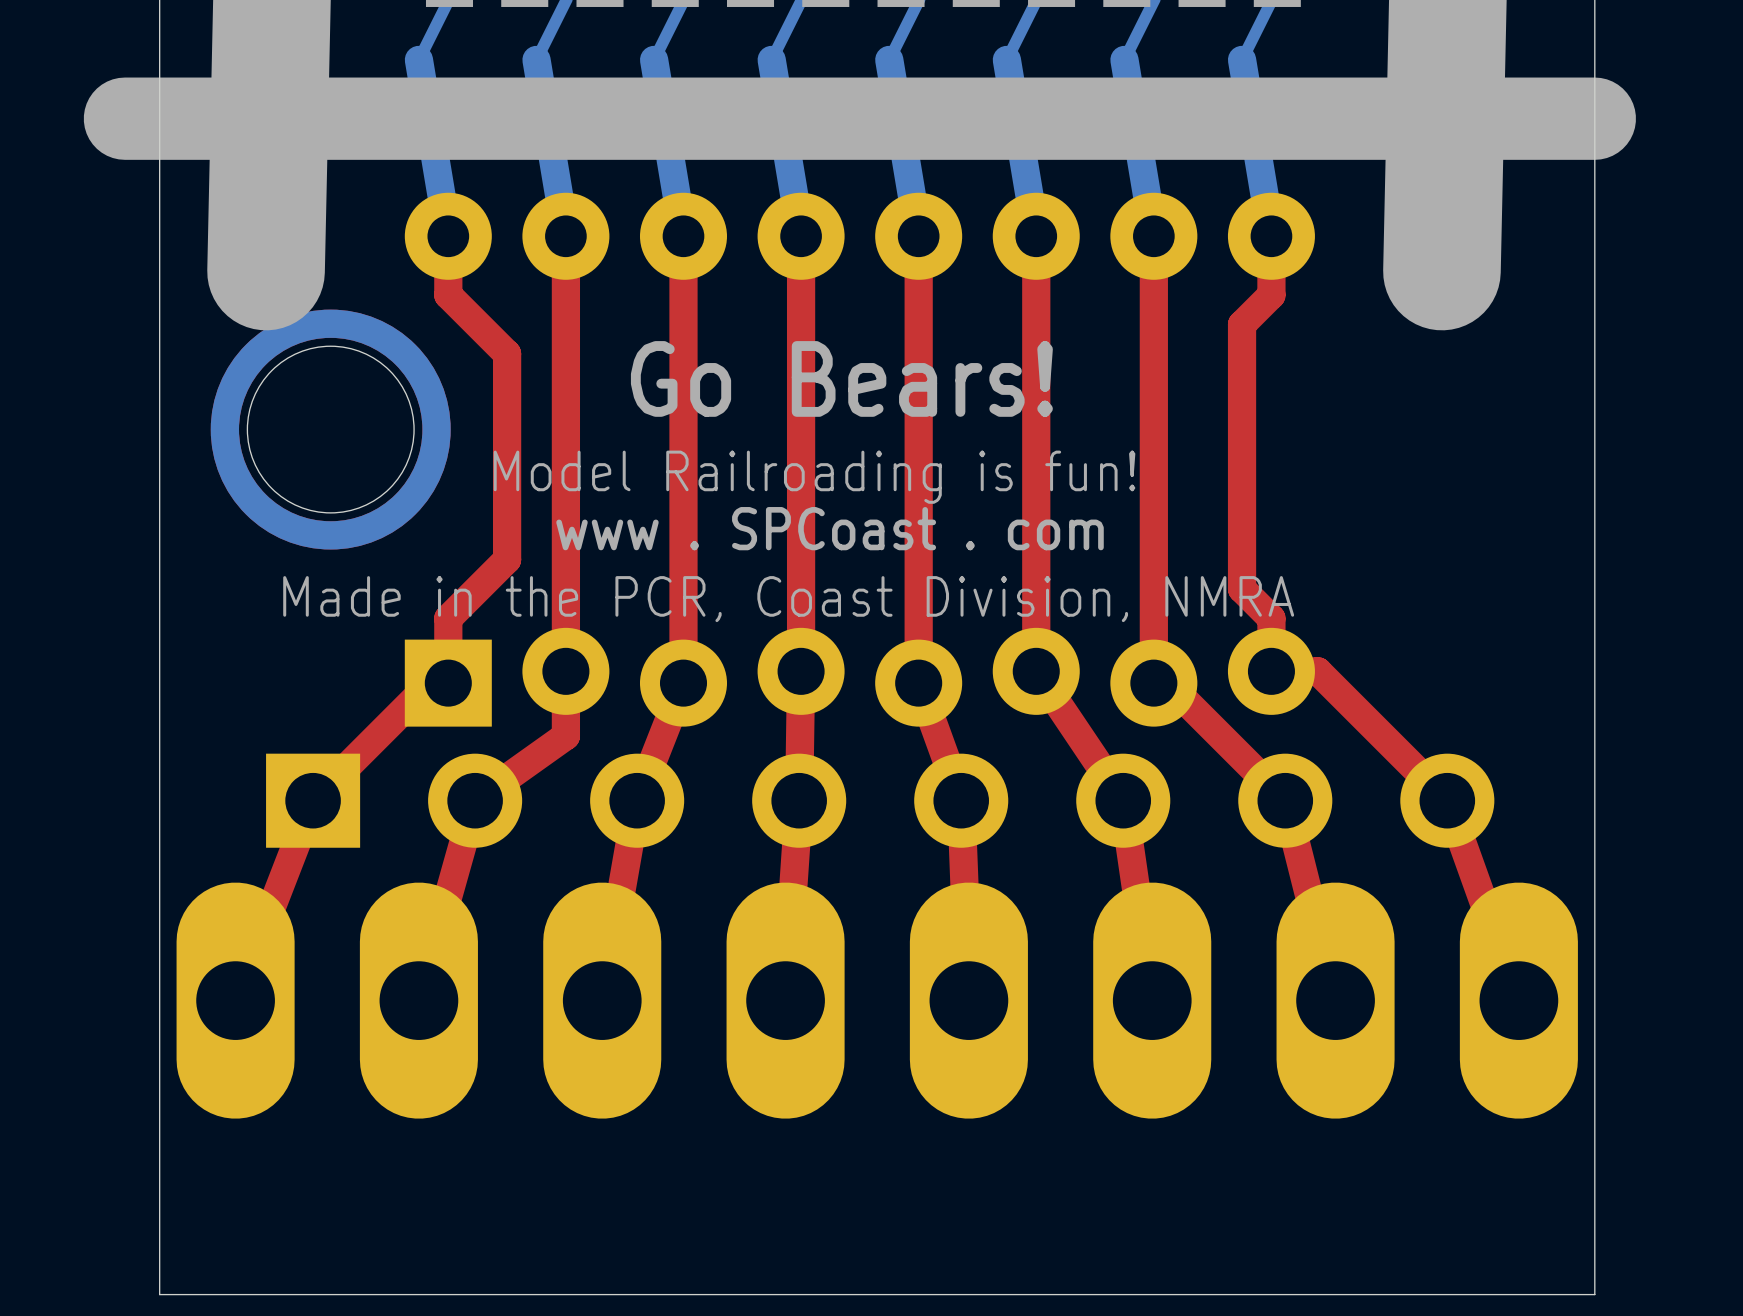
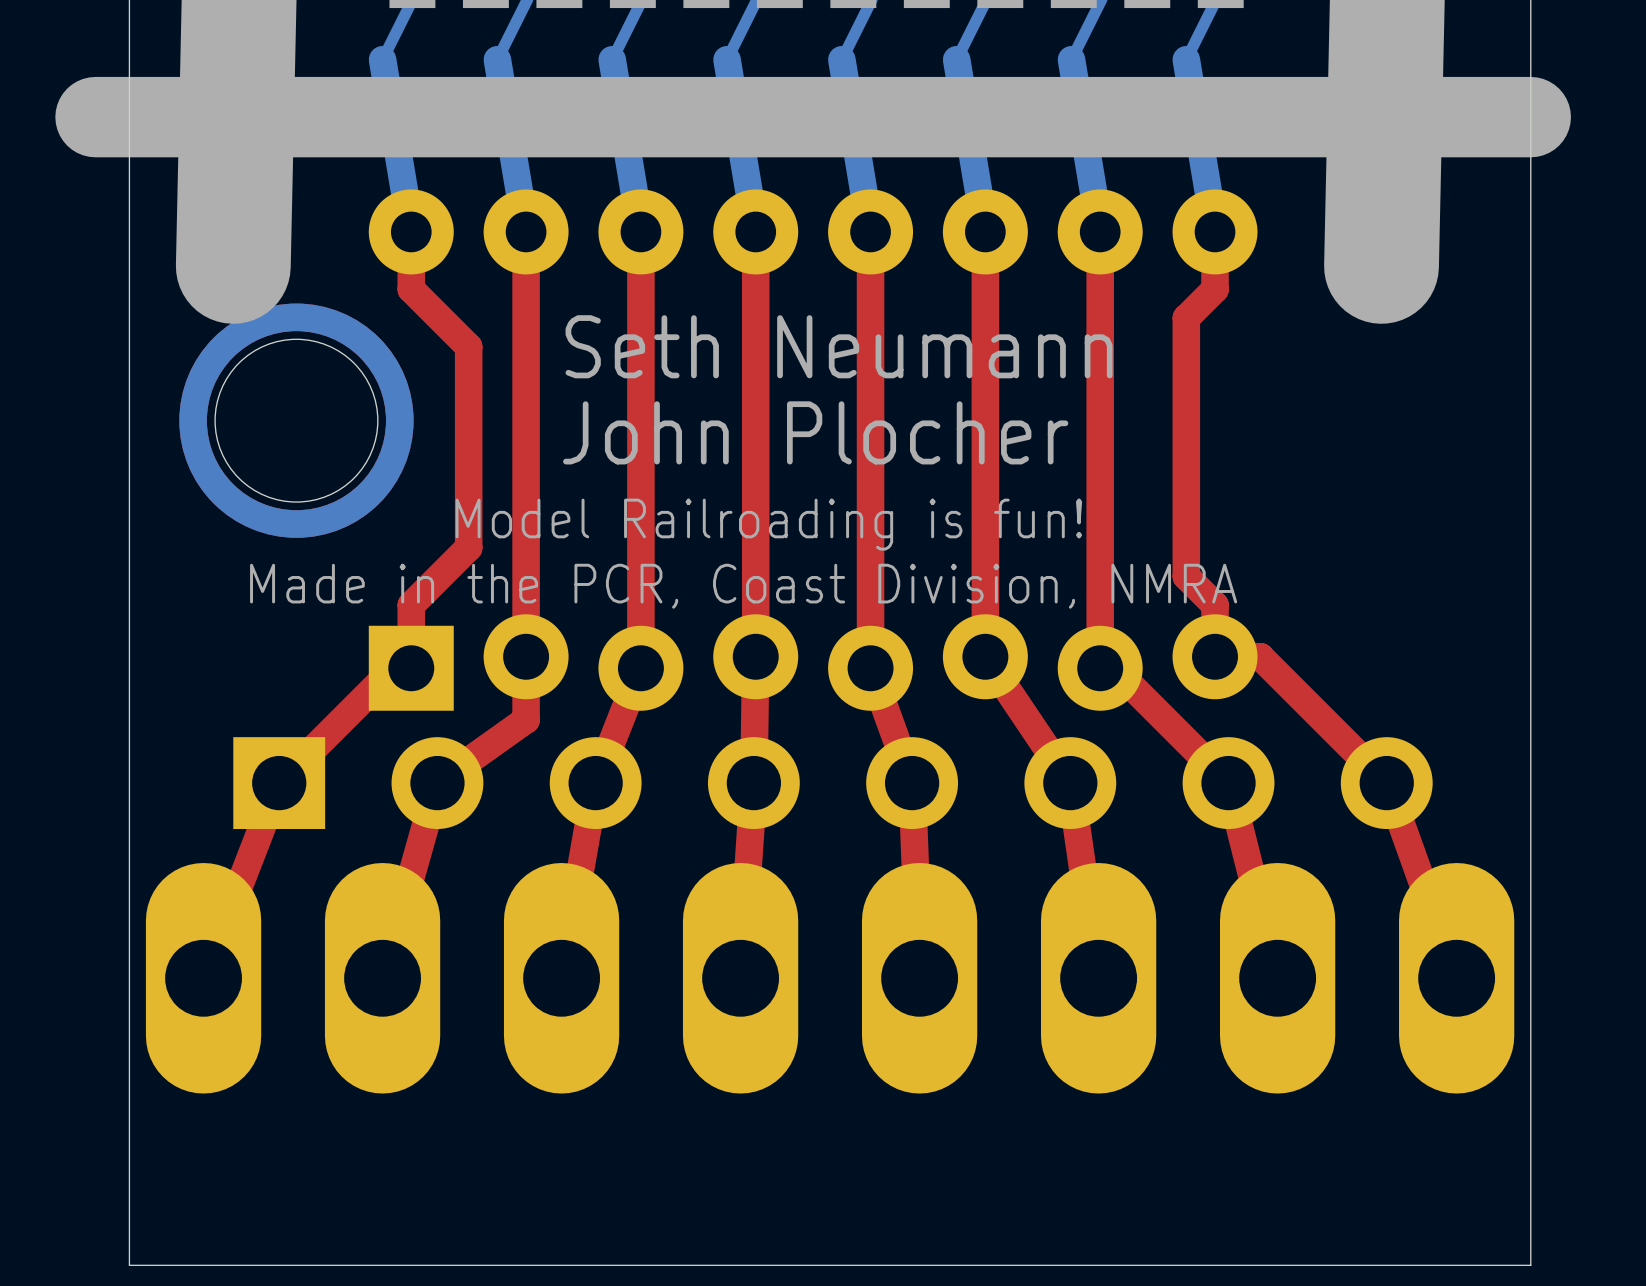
text: none -> Seth Neumann (839, 346)
text: Go Bears! (841, 378) -> none
text: none -> John Plocher (815, 432)
text position: Model Railroading is fun! (814, 477) -> Model Railroading is fun! (768, 524)
text: www . SPCoast . com (830, 528) -> none

